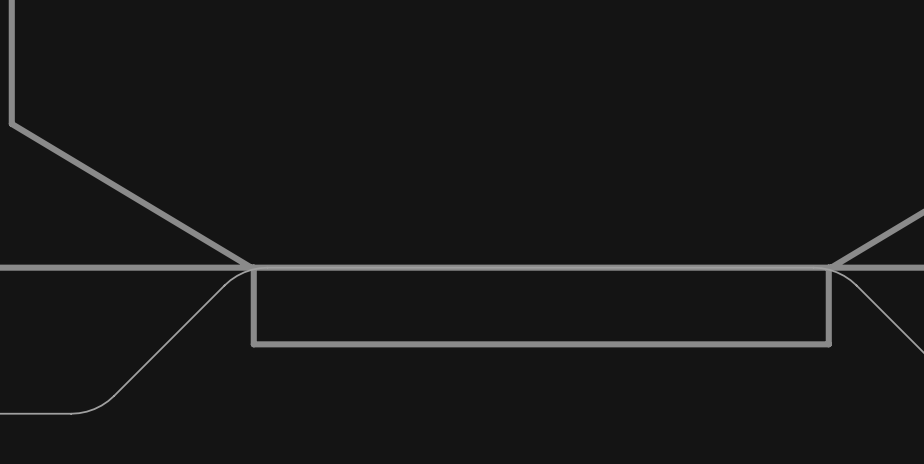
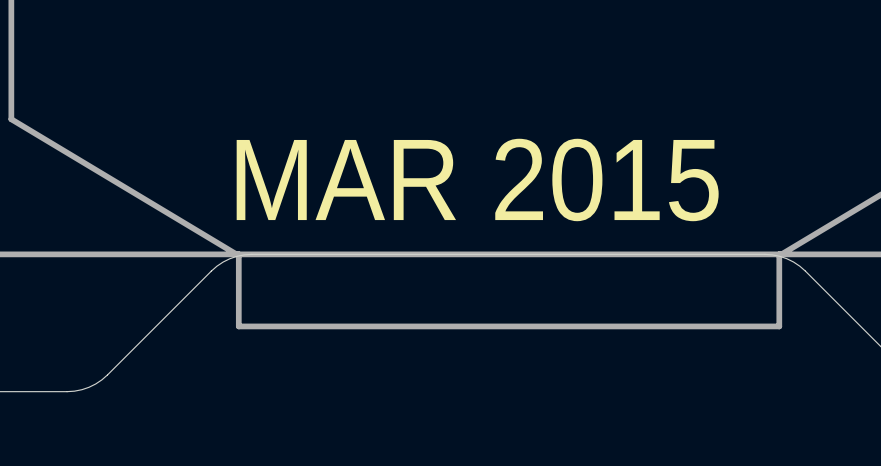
text: none -> MAR 2015 (477, 179)

